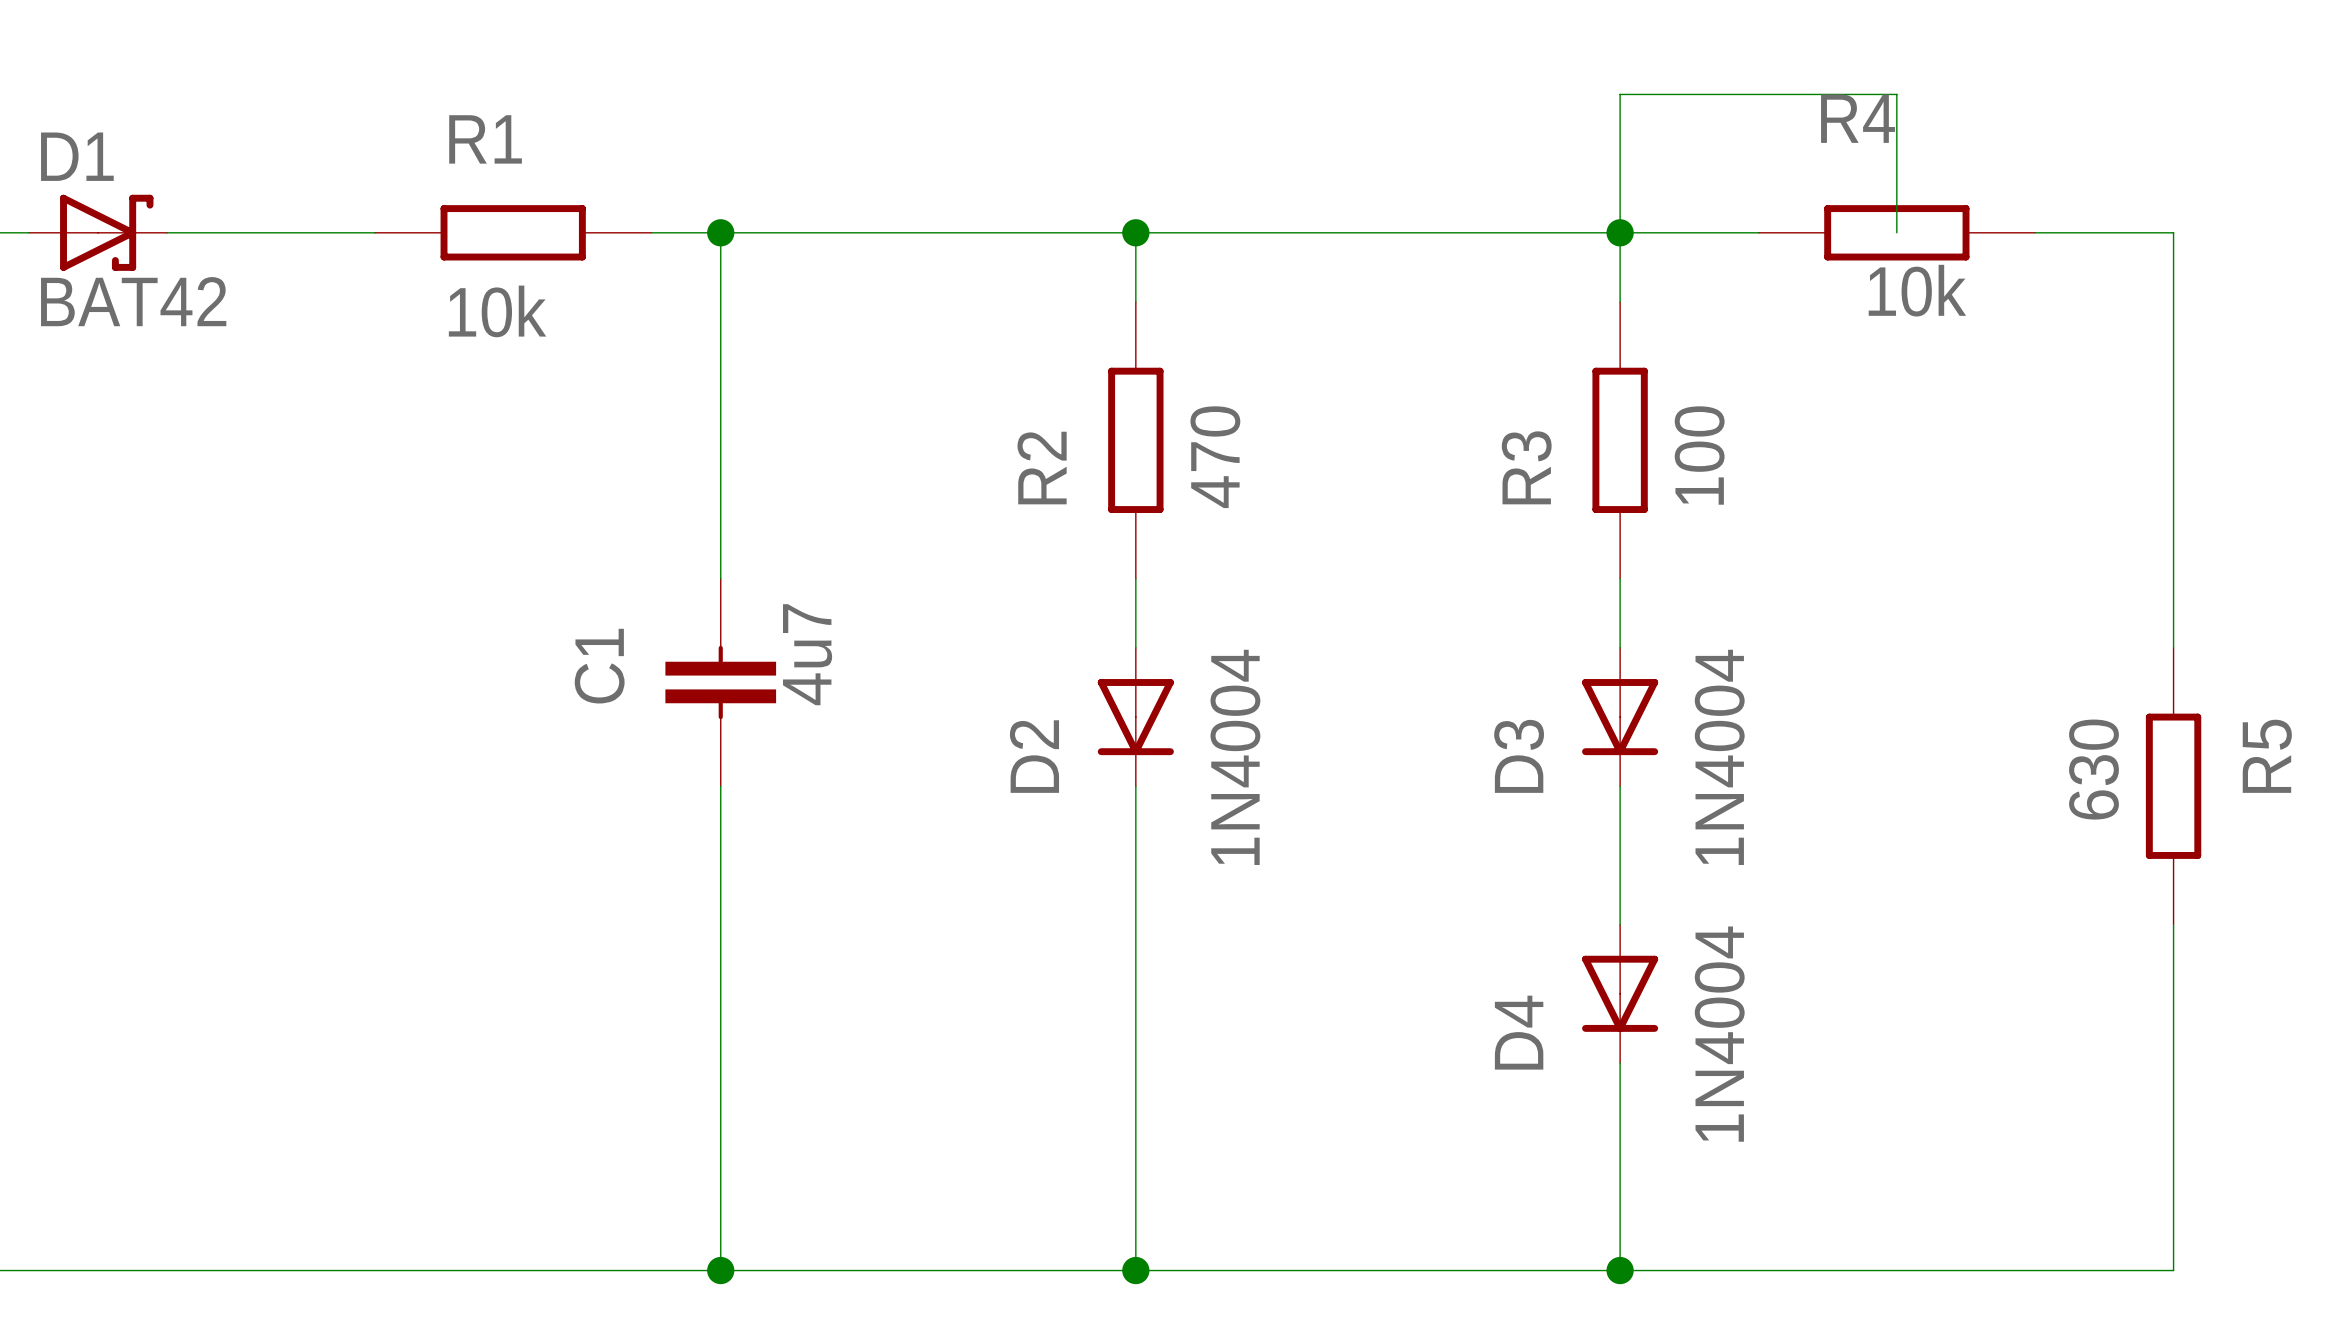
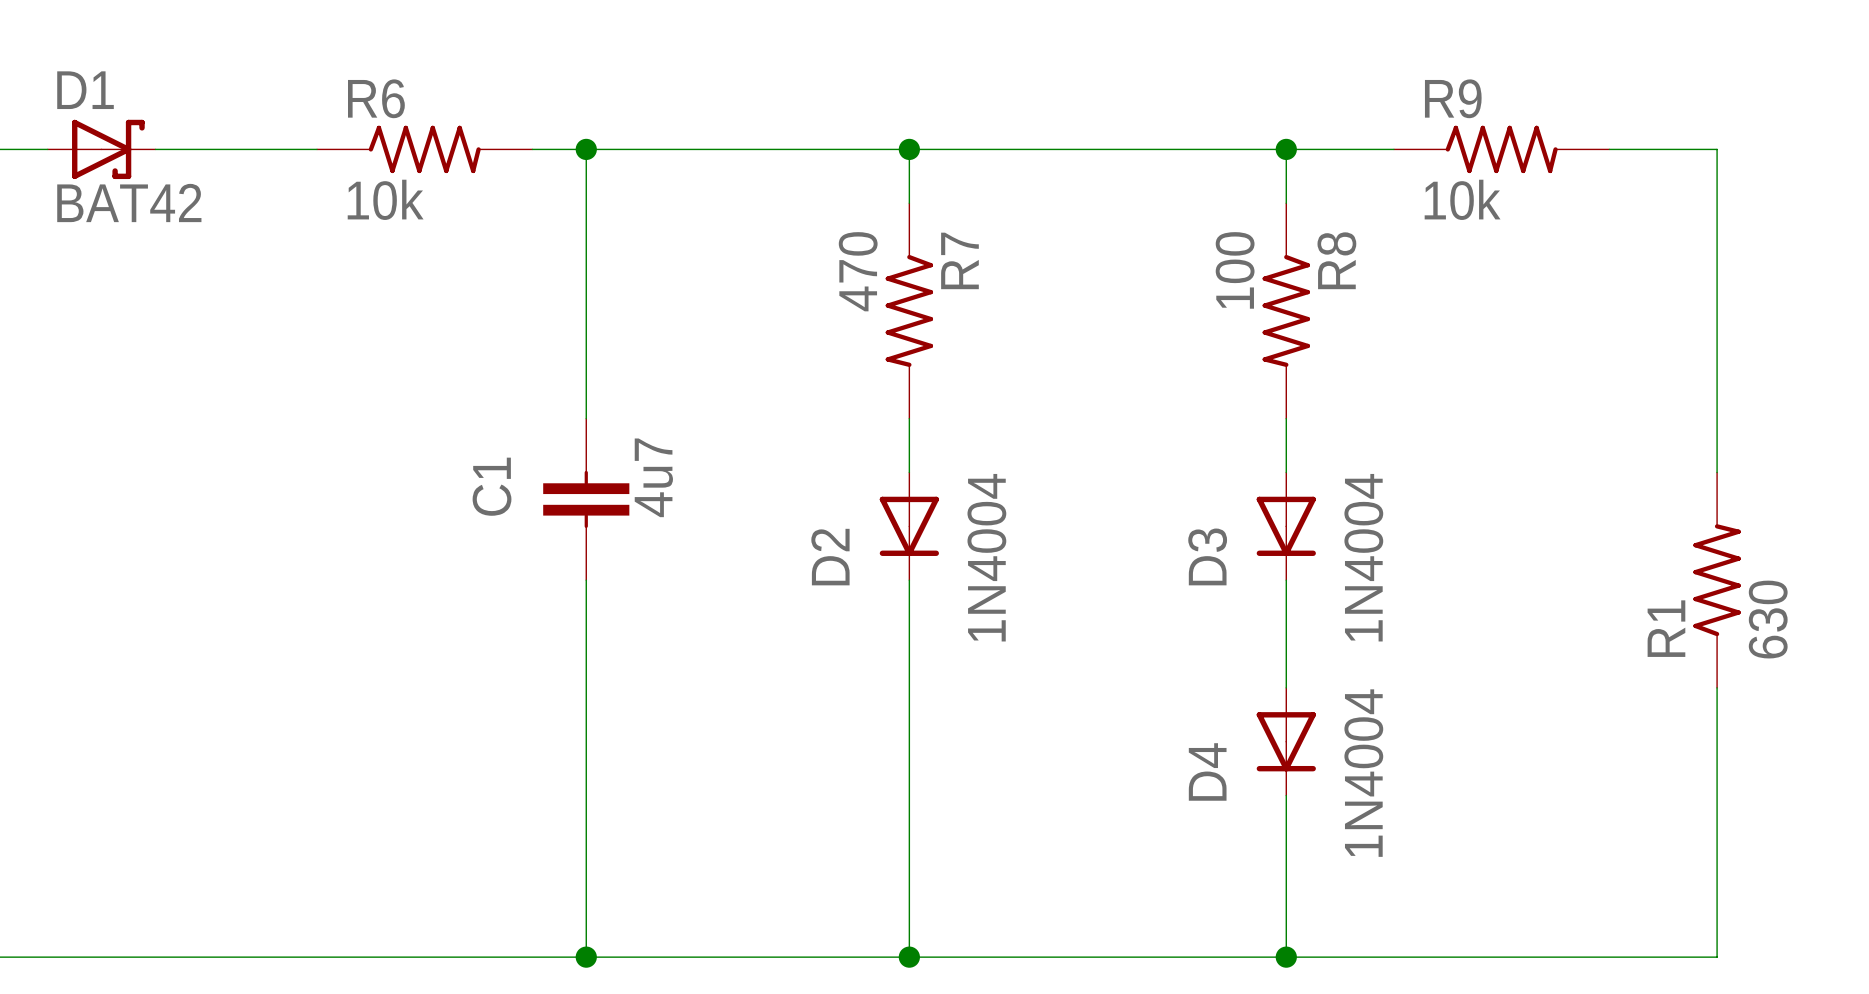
R1 name position: R1 (485, 139) -> R1 (1666, 628)
R1 symbol: [374, 205, 652, 261] -> [1693, 472, 1741, 688]
R6: none -> 10k (424, 149)
wire: (1620, 232) (1620, 94) (1896, 94) (1896, 232) -> none
R4: 10k (1896, 232) -> none
R9: none -> 10k (1501, 149)
R1 value: 10k (497, 311) -> 630 (1768, 619)
R2: 470 (1135, 440) -> none
R7: none -> 470 (909, 310)
R3: 100 (1620, 440) -> none
R8: none -> 100 (1286, 310)
R5: 630 (2173, 786) -> none

